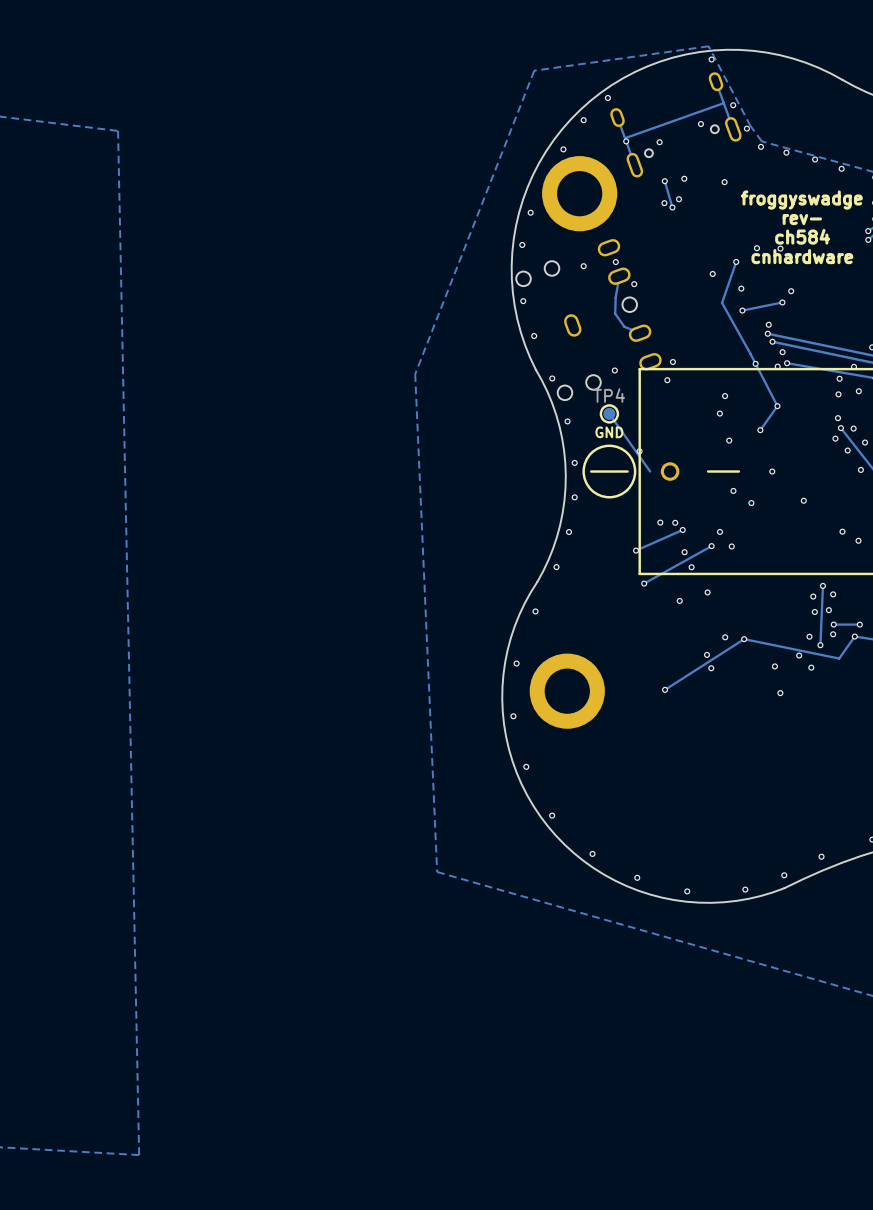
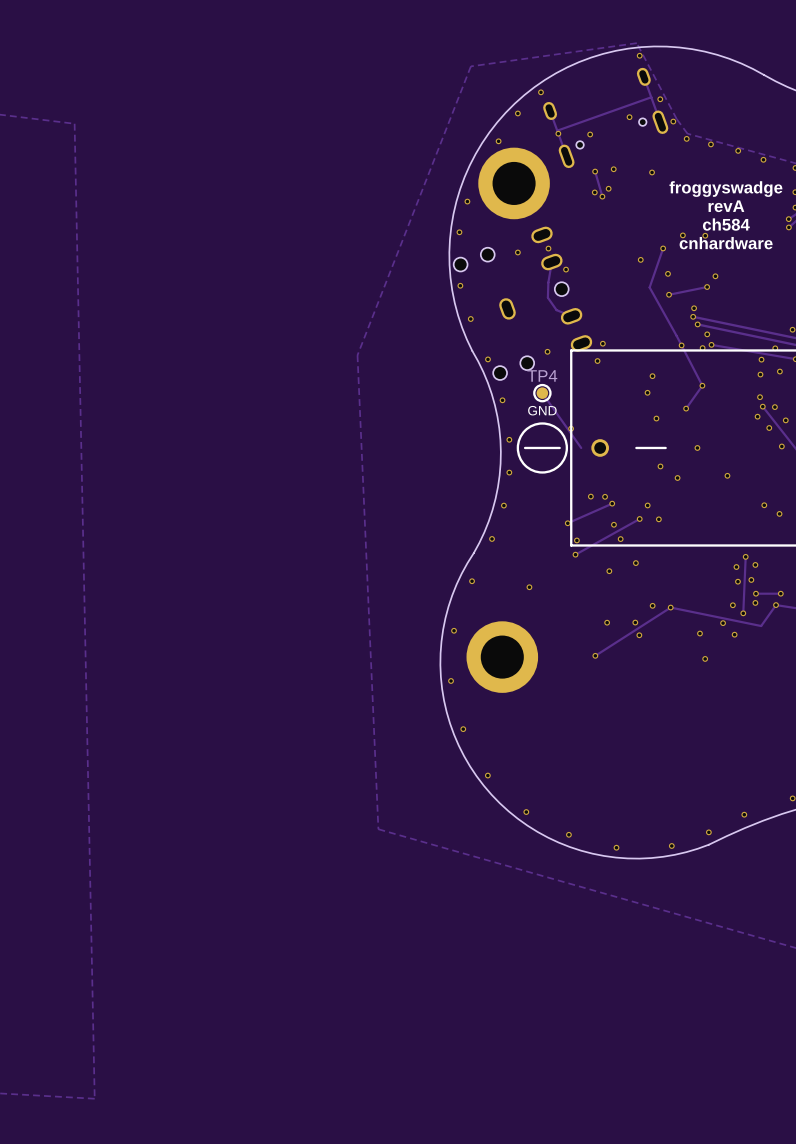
text: rev- (802, 219) -> revA (726, 206)
via: none -> (576, 540)
via: none -> (529, 587)
via: none -> (607, 622)

